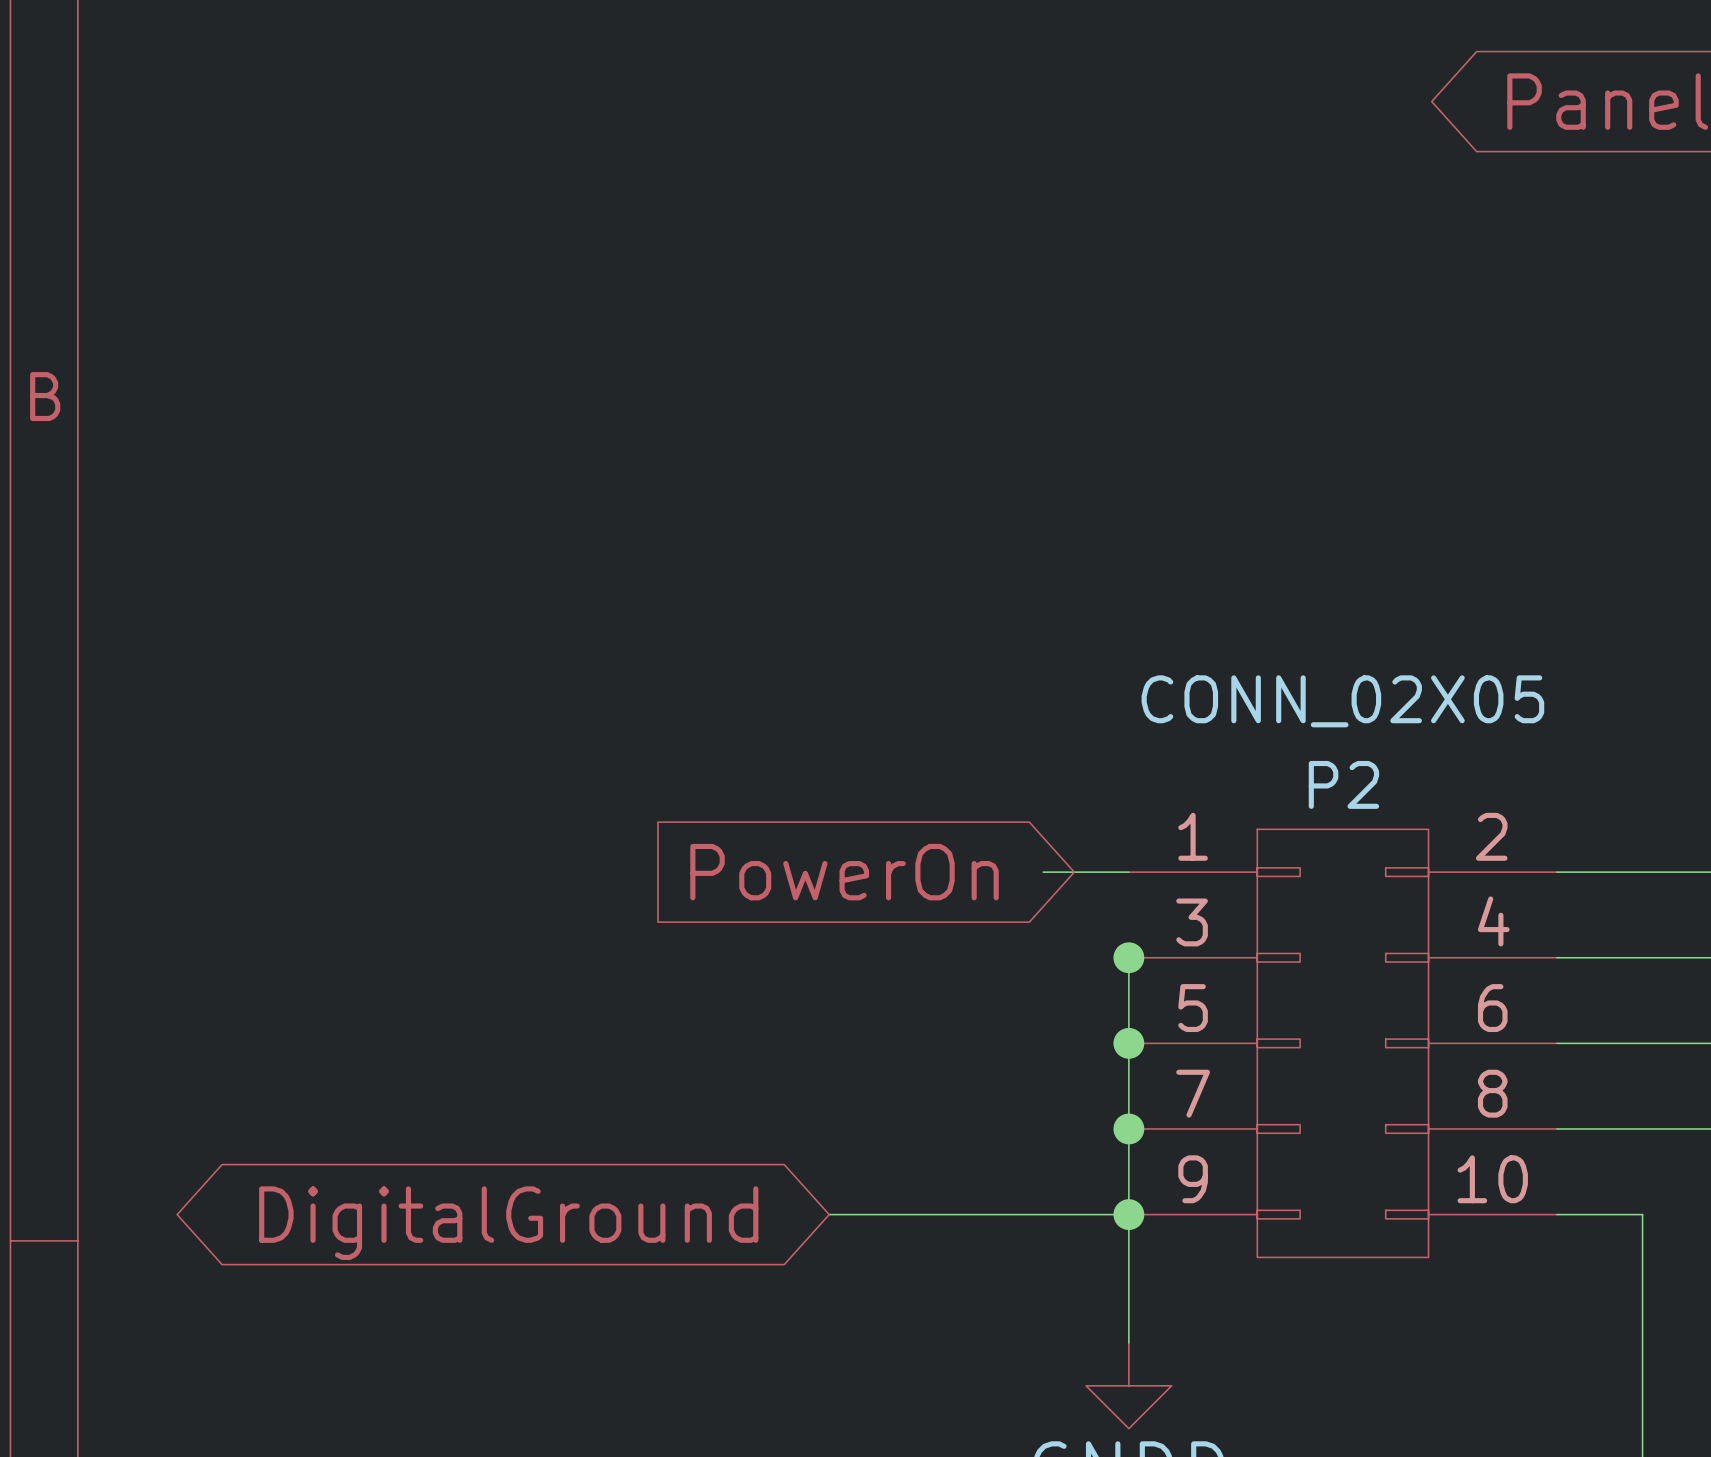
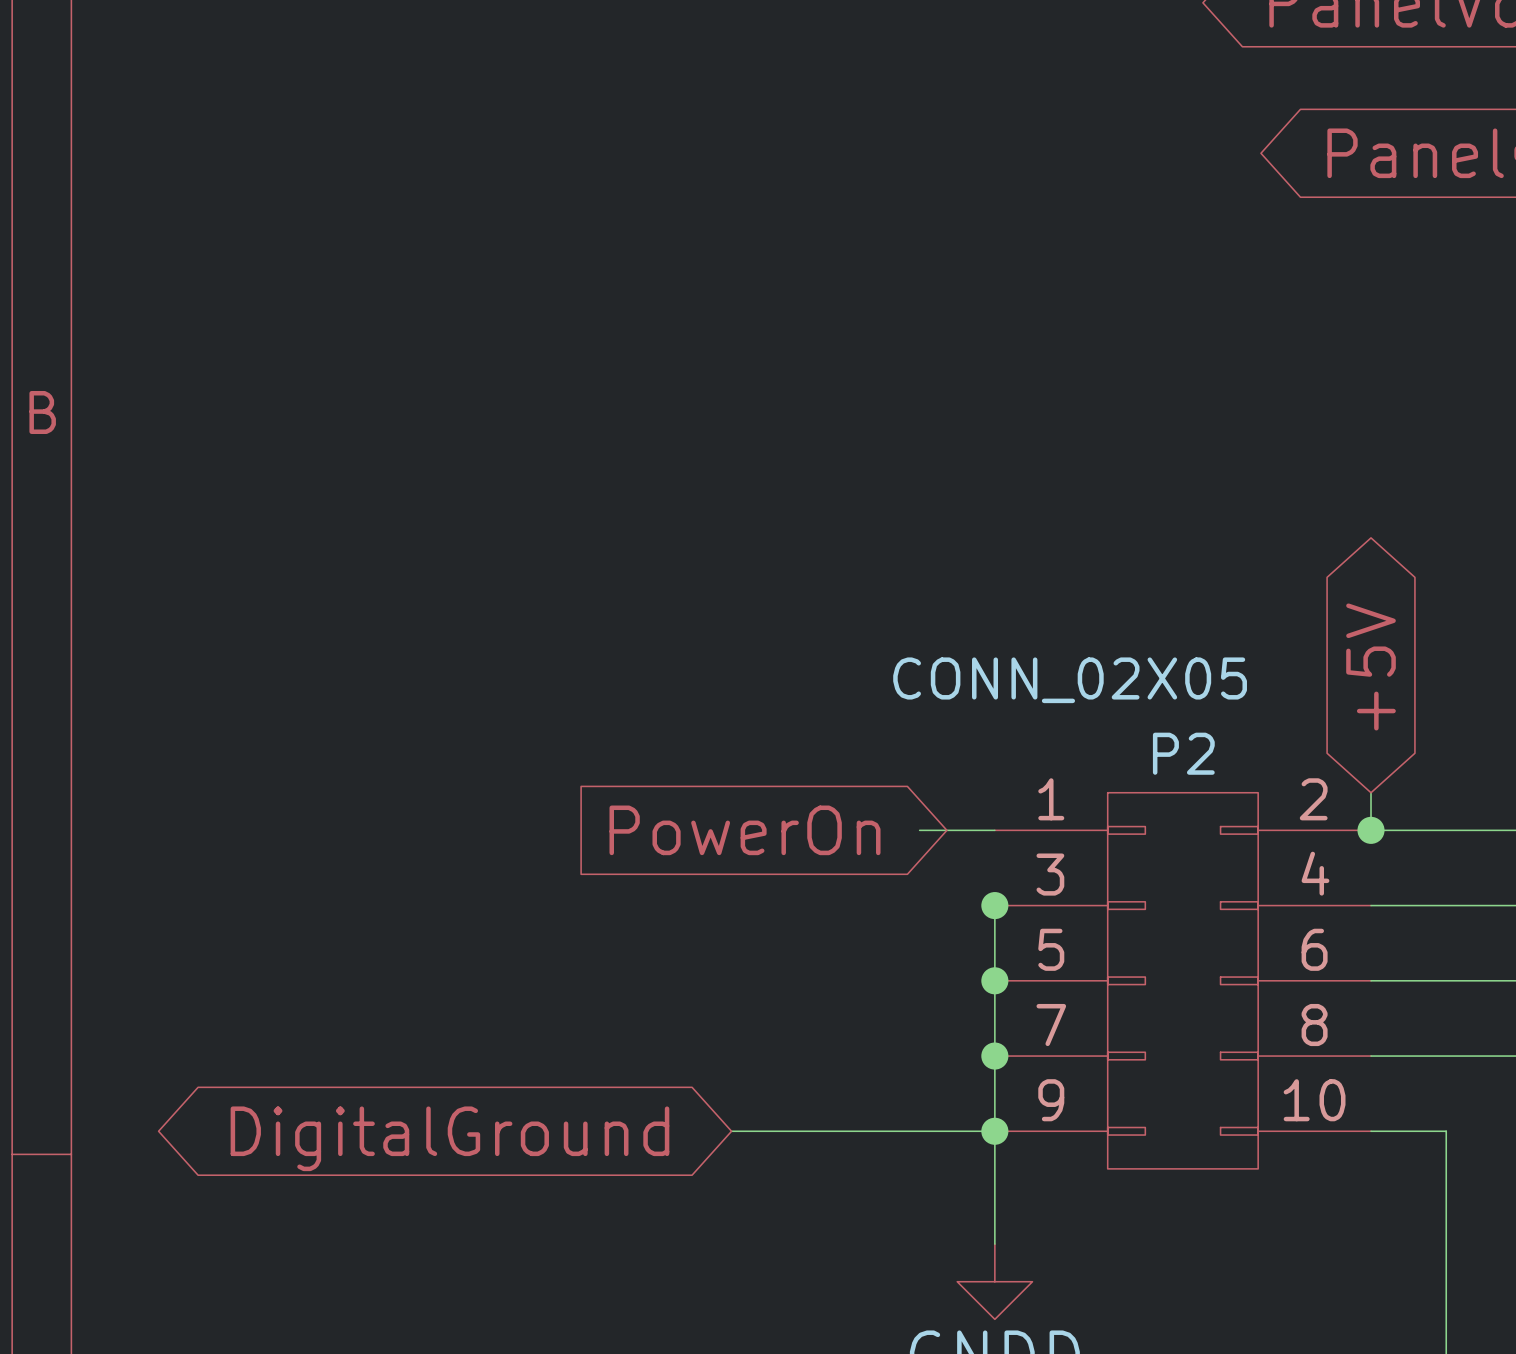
global label: none -> +5V (1371, 666)
P2 value position: CONN_02X05 (1342, 701) -> CONN_02X05 (1070, 680)
wire: none -> (1371, 792) (1371, 830)
junction: none -> (1371, 830)

